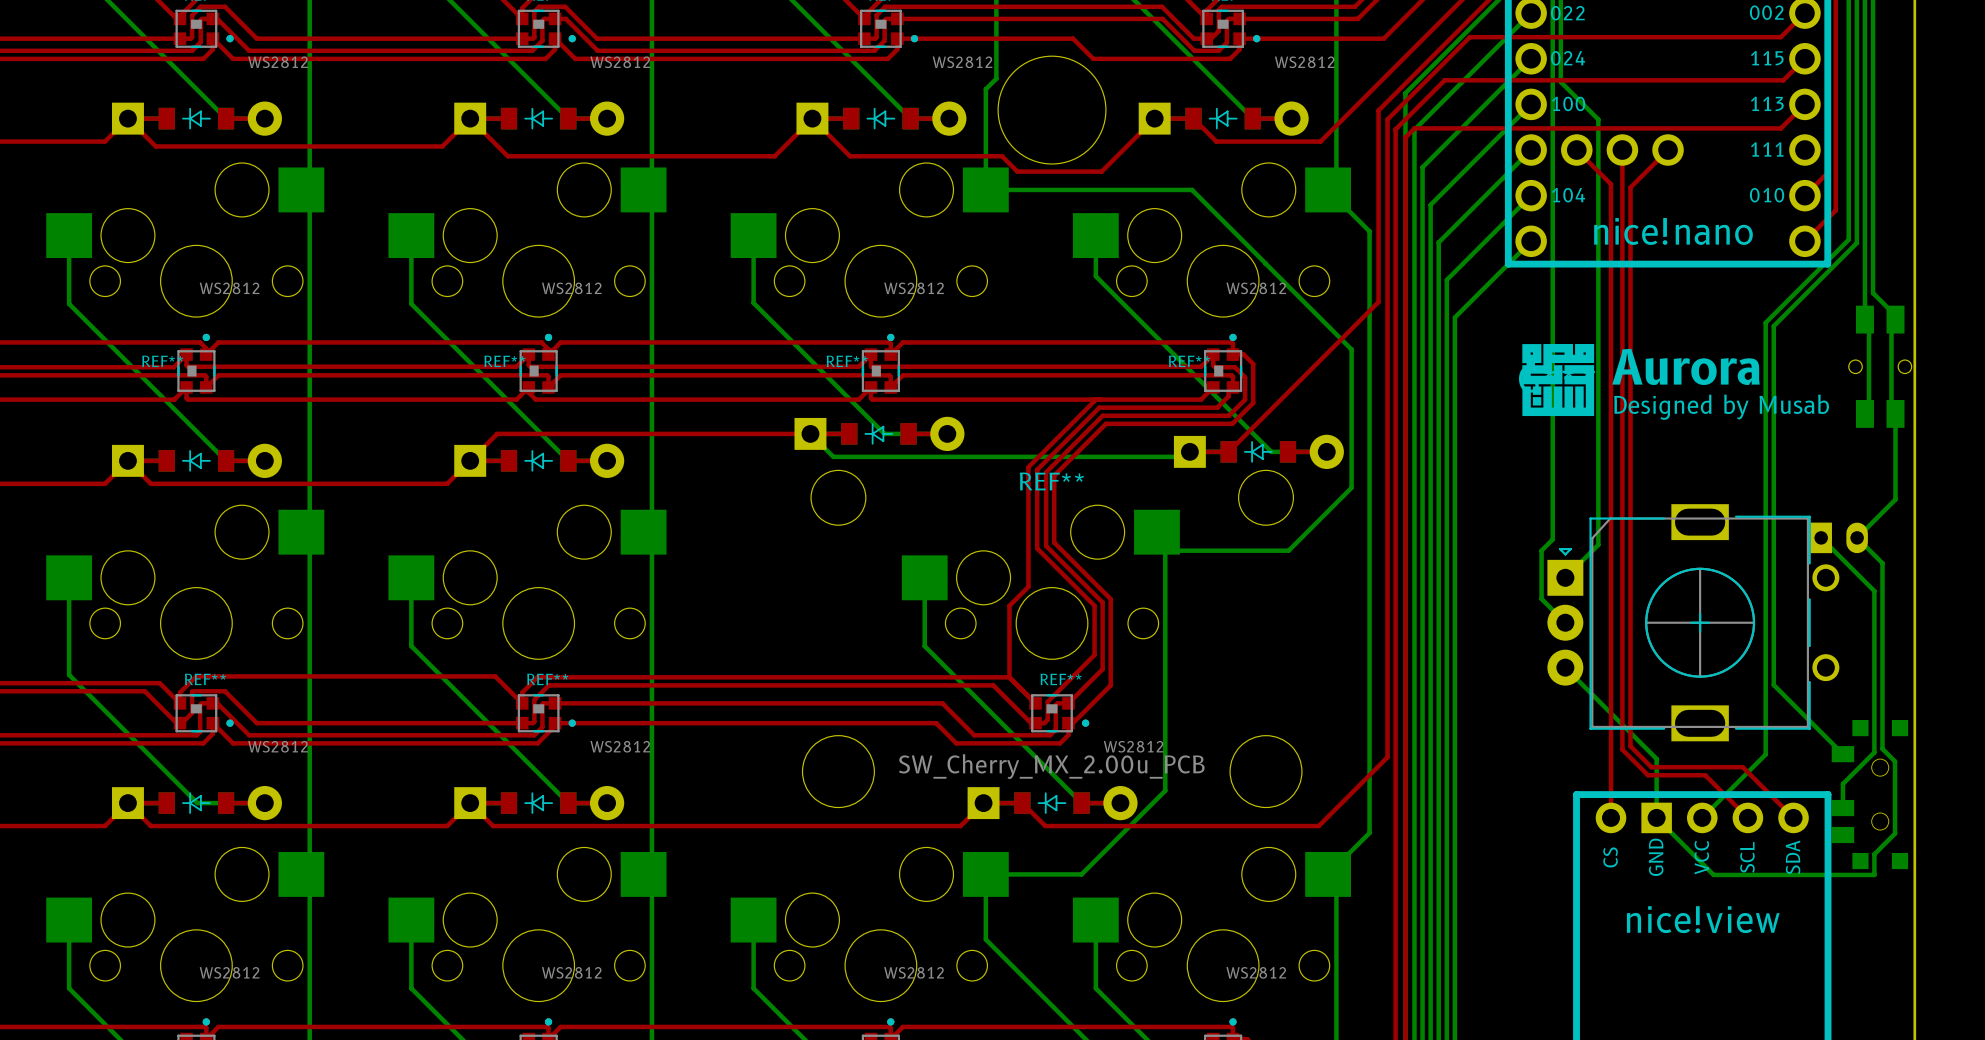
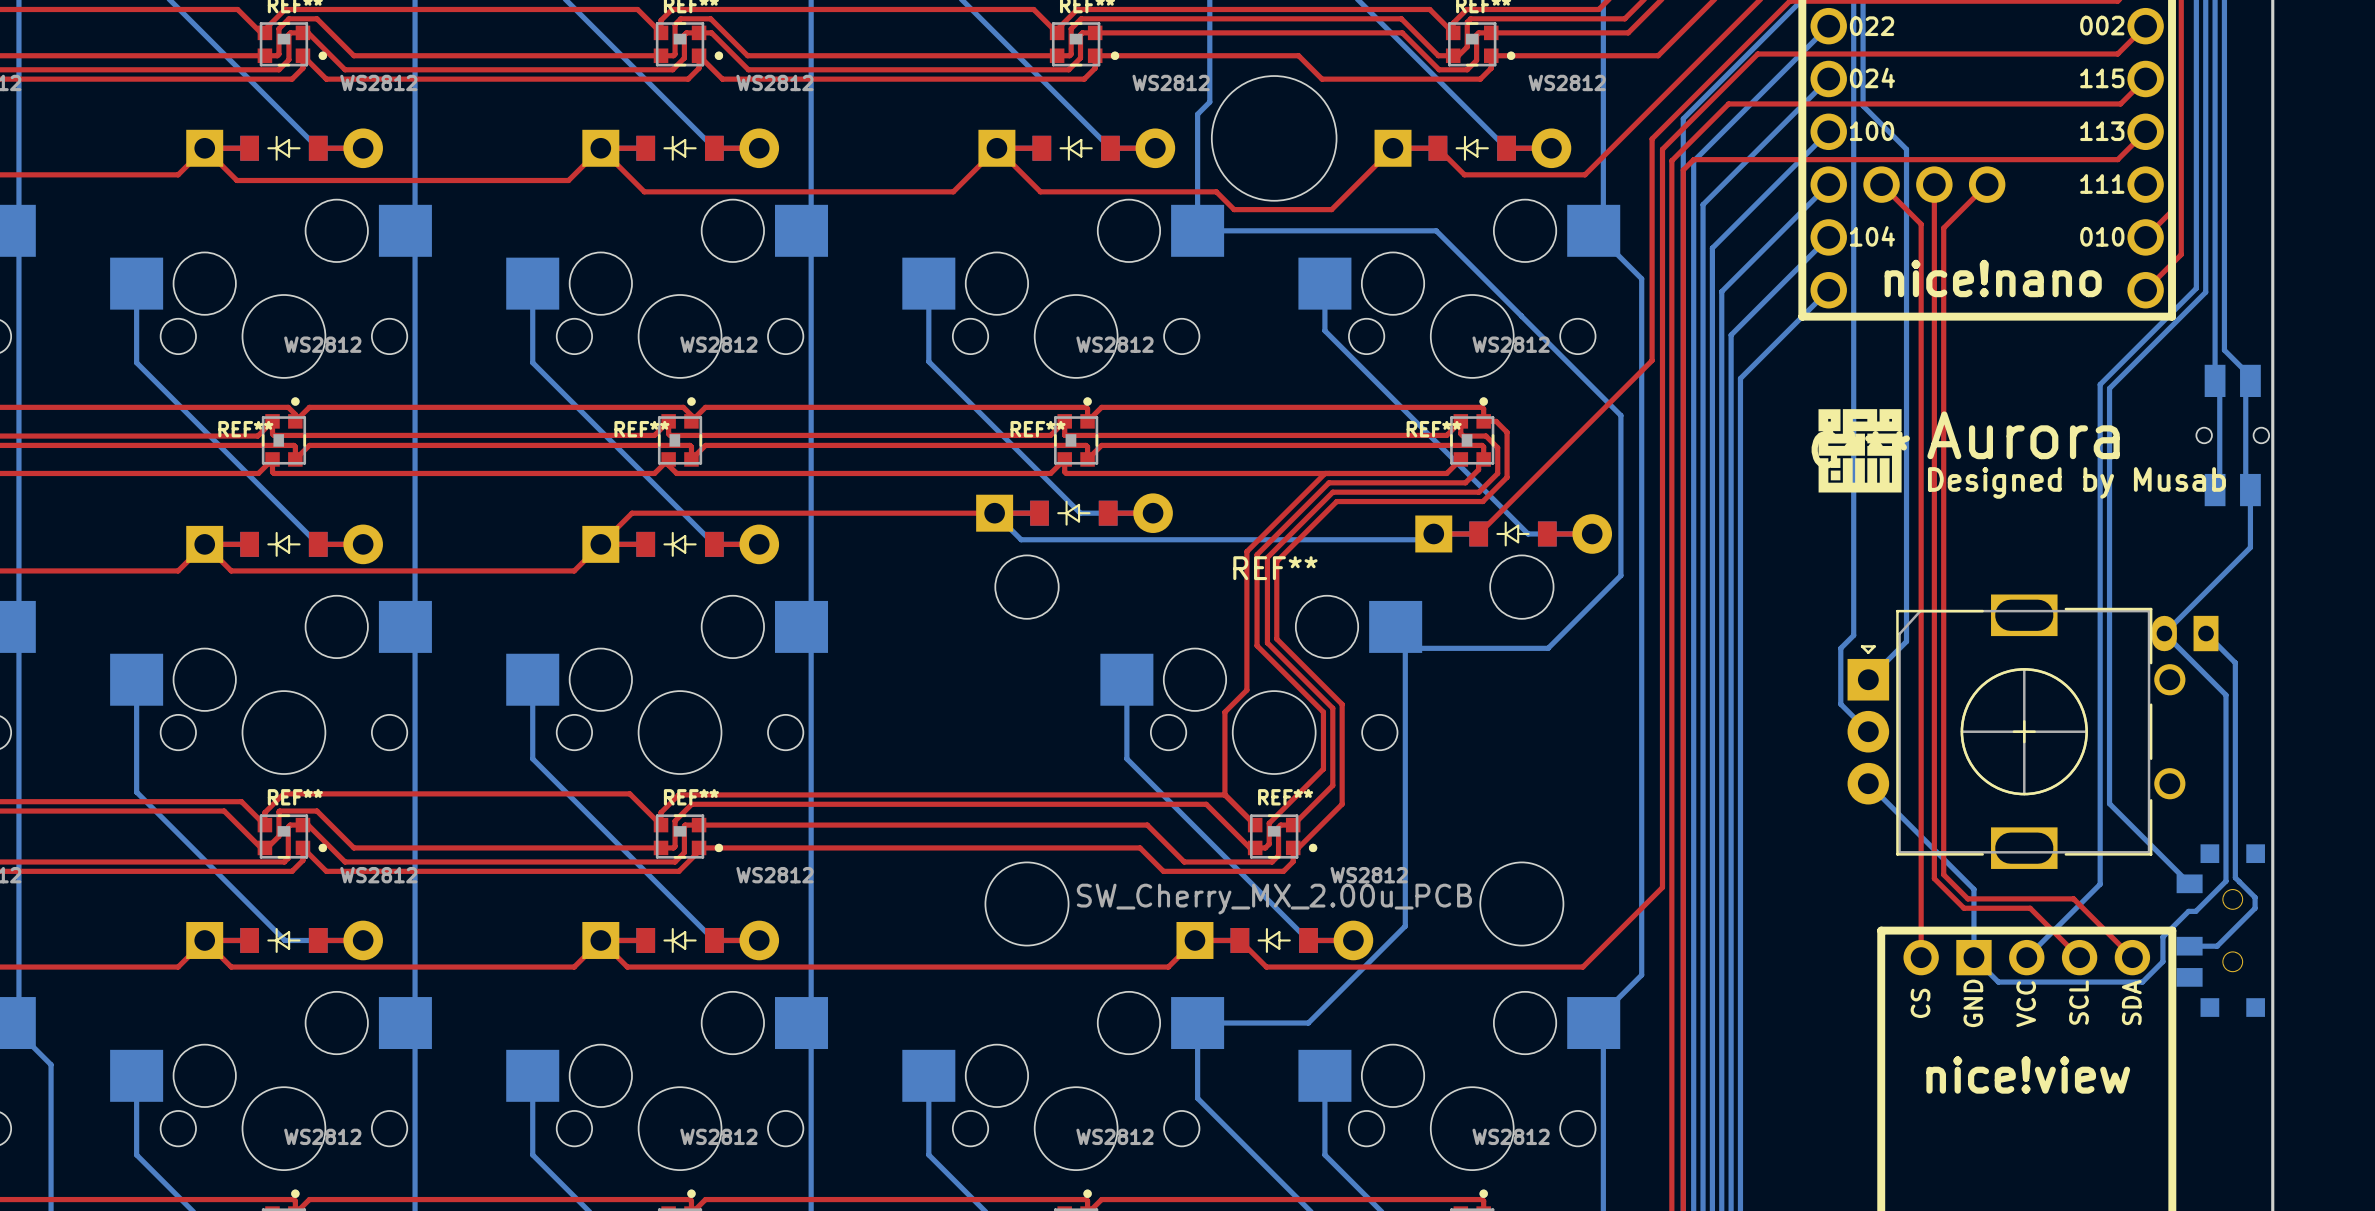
bottom track: (1895, 463) (1895, 499) (1857, 537) -> (2250, 547) (2164, 633)
part rotation: 0° (1839, 537) -> 180° (2185, 633)
bottom track: (1874, 751) (1842, 783) (1842, 808) -> (2249, 892) (2255, 897) (2255, 908) (2217, 946) (2189, 946)
bottom track: (1895, 761) (1895, 833) (1874, 854) (1874, 874) (1713, 874) (1677, 839) -> (2225, 881) (2195, 911) (2188, 911) (2162, 937) (2162, 961) (2142, 982) (1998, 982)

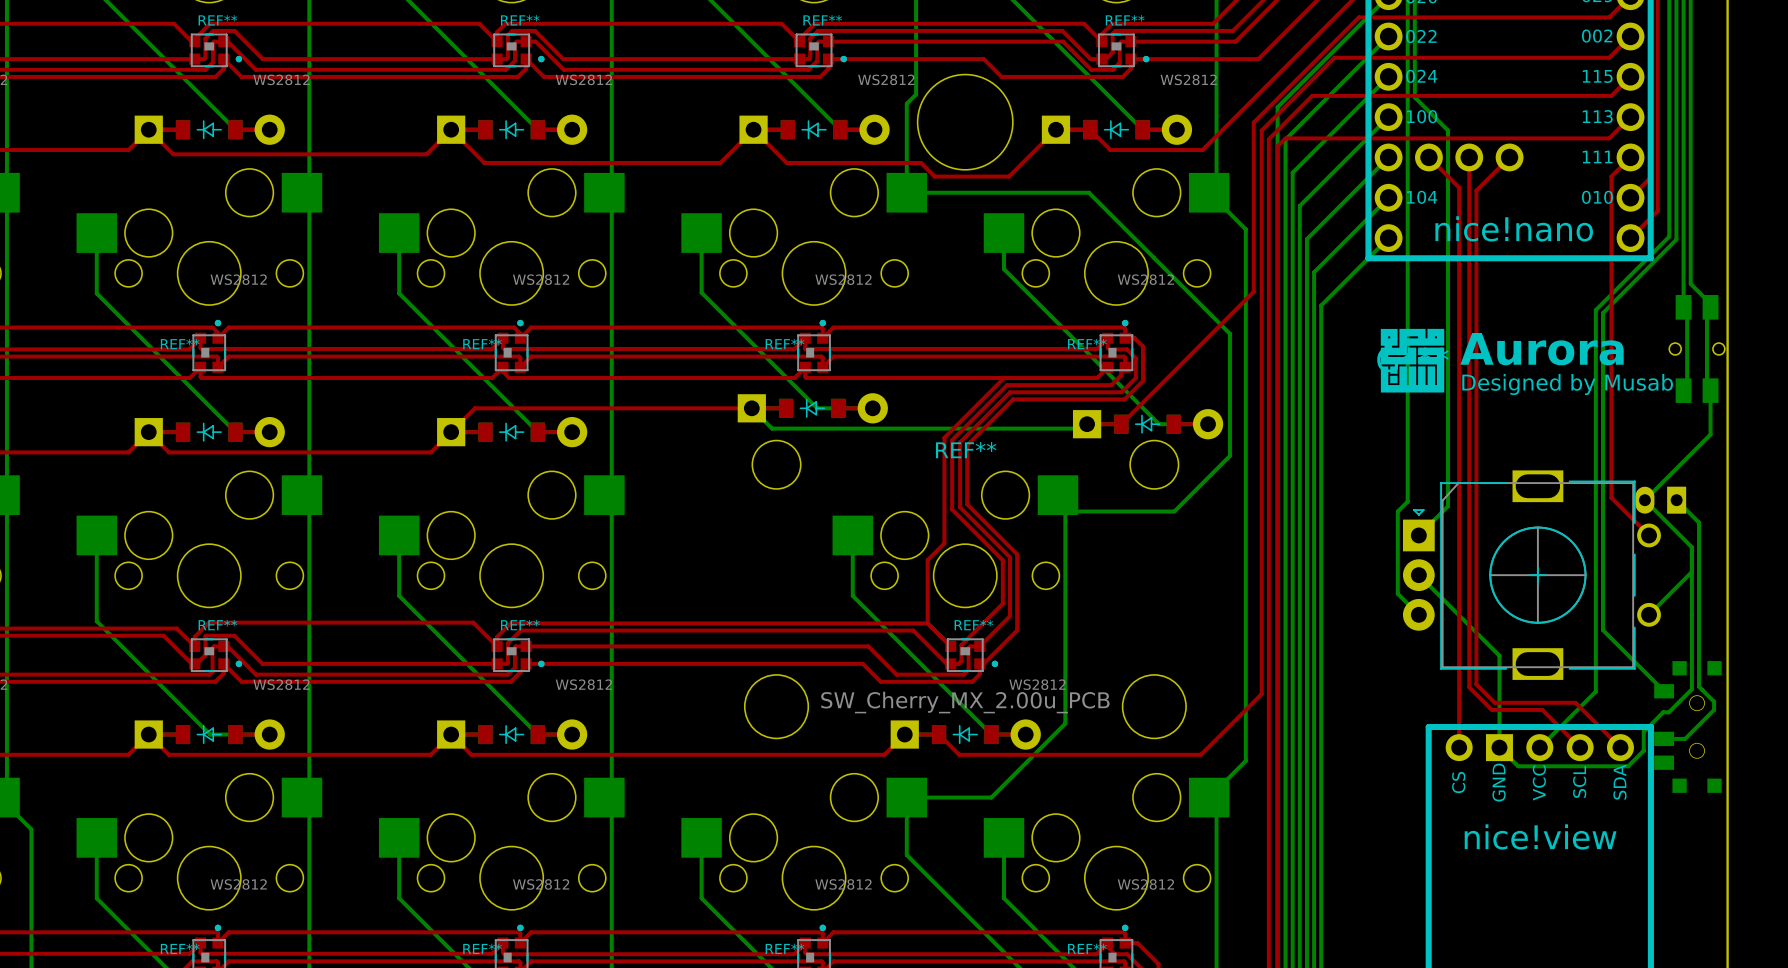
top track: none -> (1630, 157) (1611, 176) (1611, 497) (1649, 535)
bottom track: (1840, 704) (1868, 731) -> (1397, 554) (1397, 593) (1418, 614)
bottom track: none -> (1691, 571) (1649, 614)
bottom track: (1868, 783) (1973, 889) -> (1418, 575) (1499, 655) (1499, 695)

